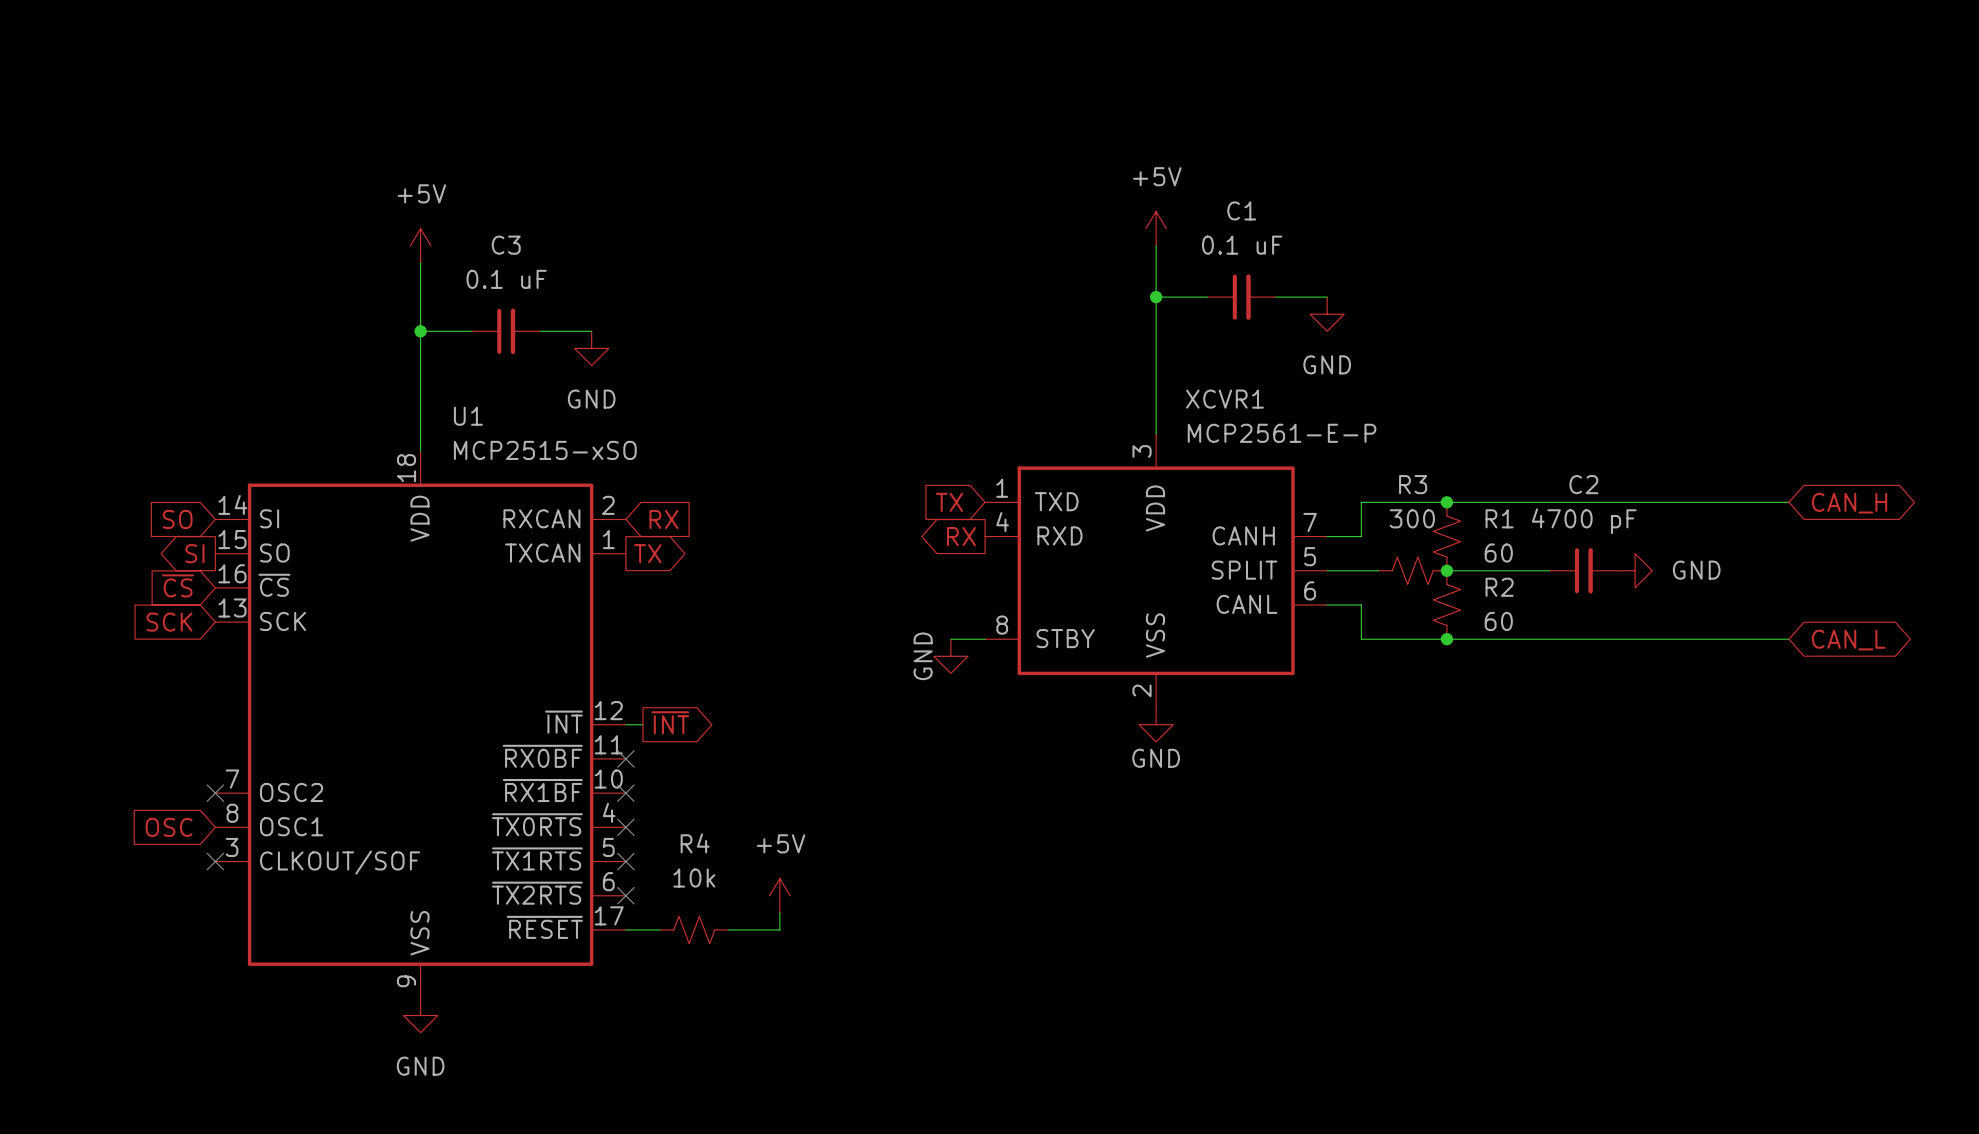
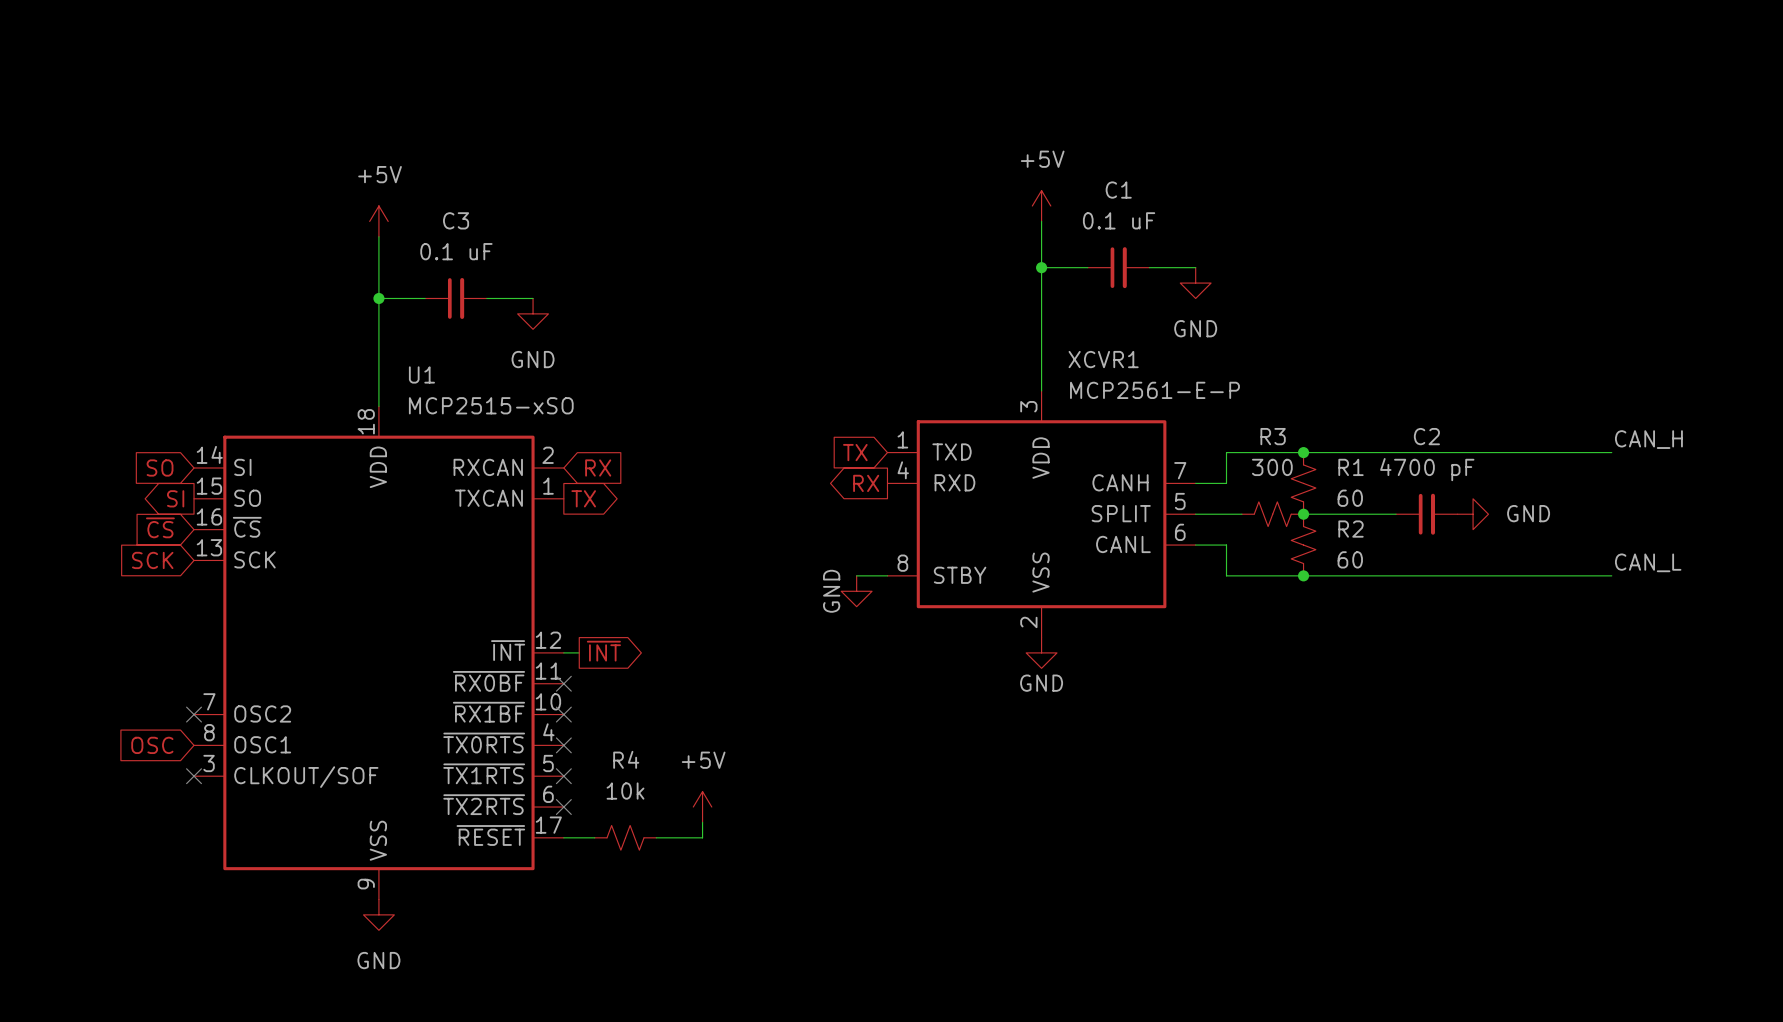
label: none -> CAN_H (1648, 439)
global label: CAN_H (1849, 503) -> none
label: none -> CAN_L (1648, 562)
global label: CAN_L (1848, 640) -> none

